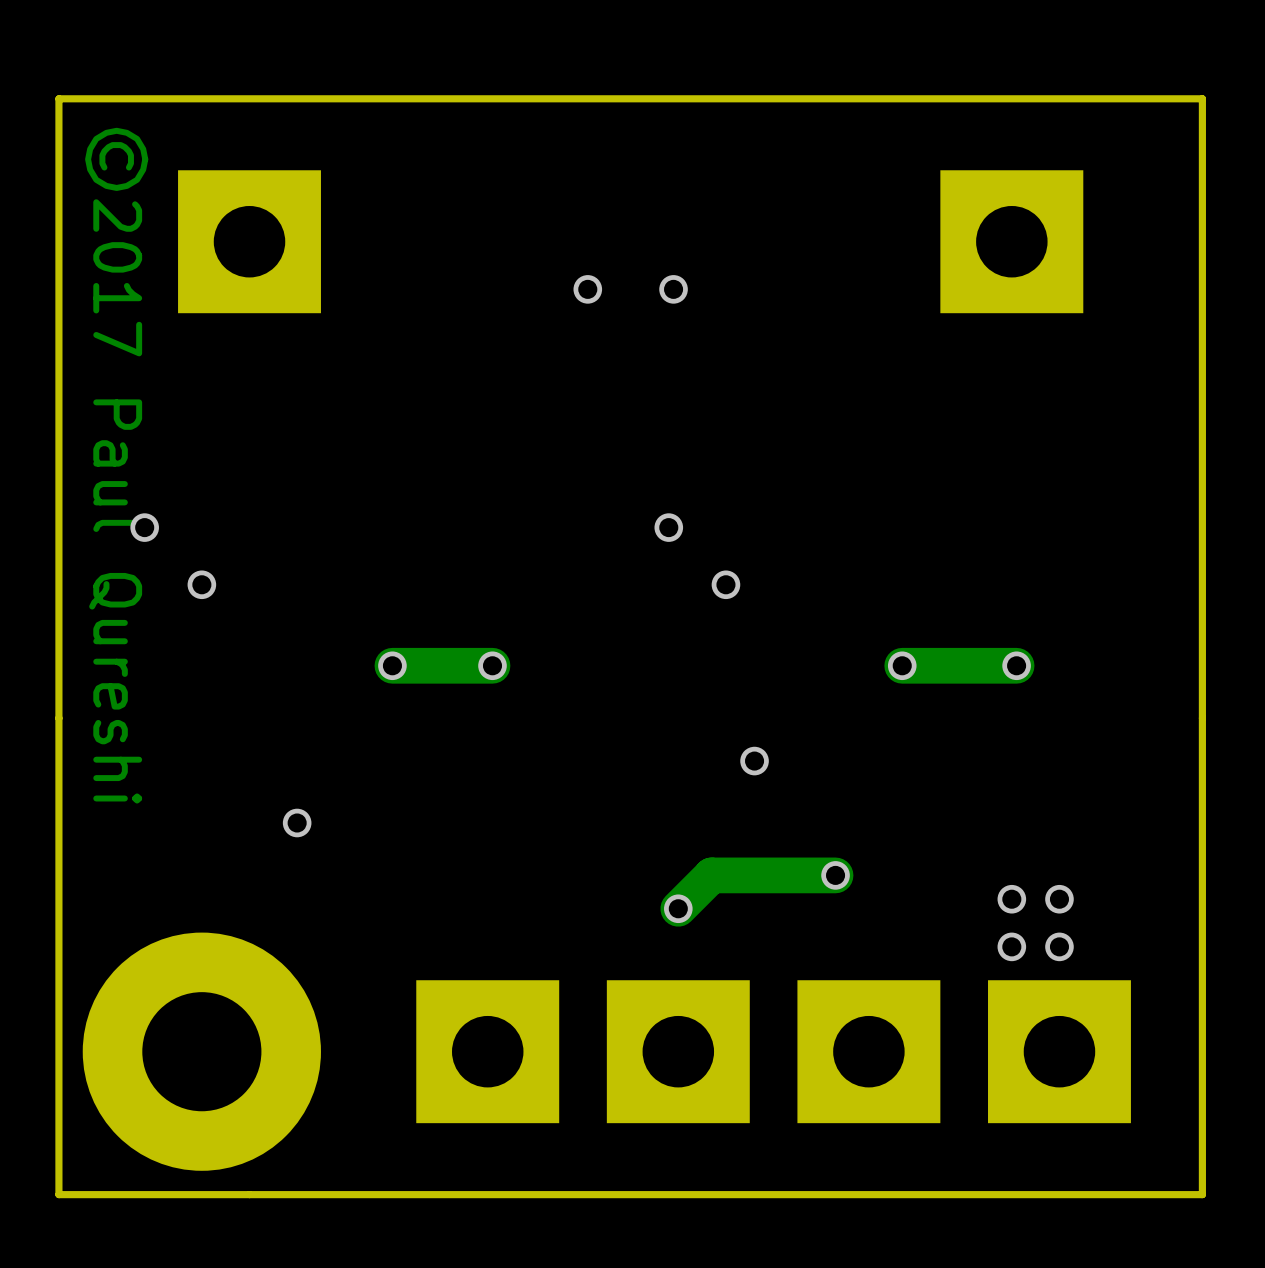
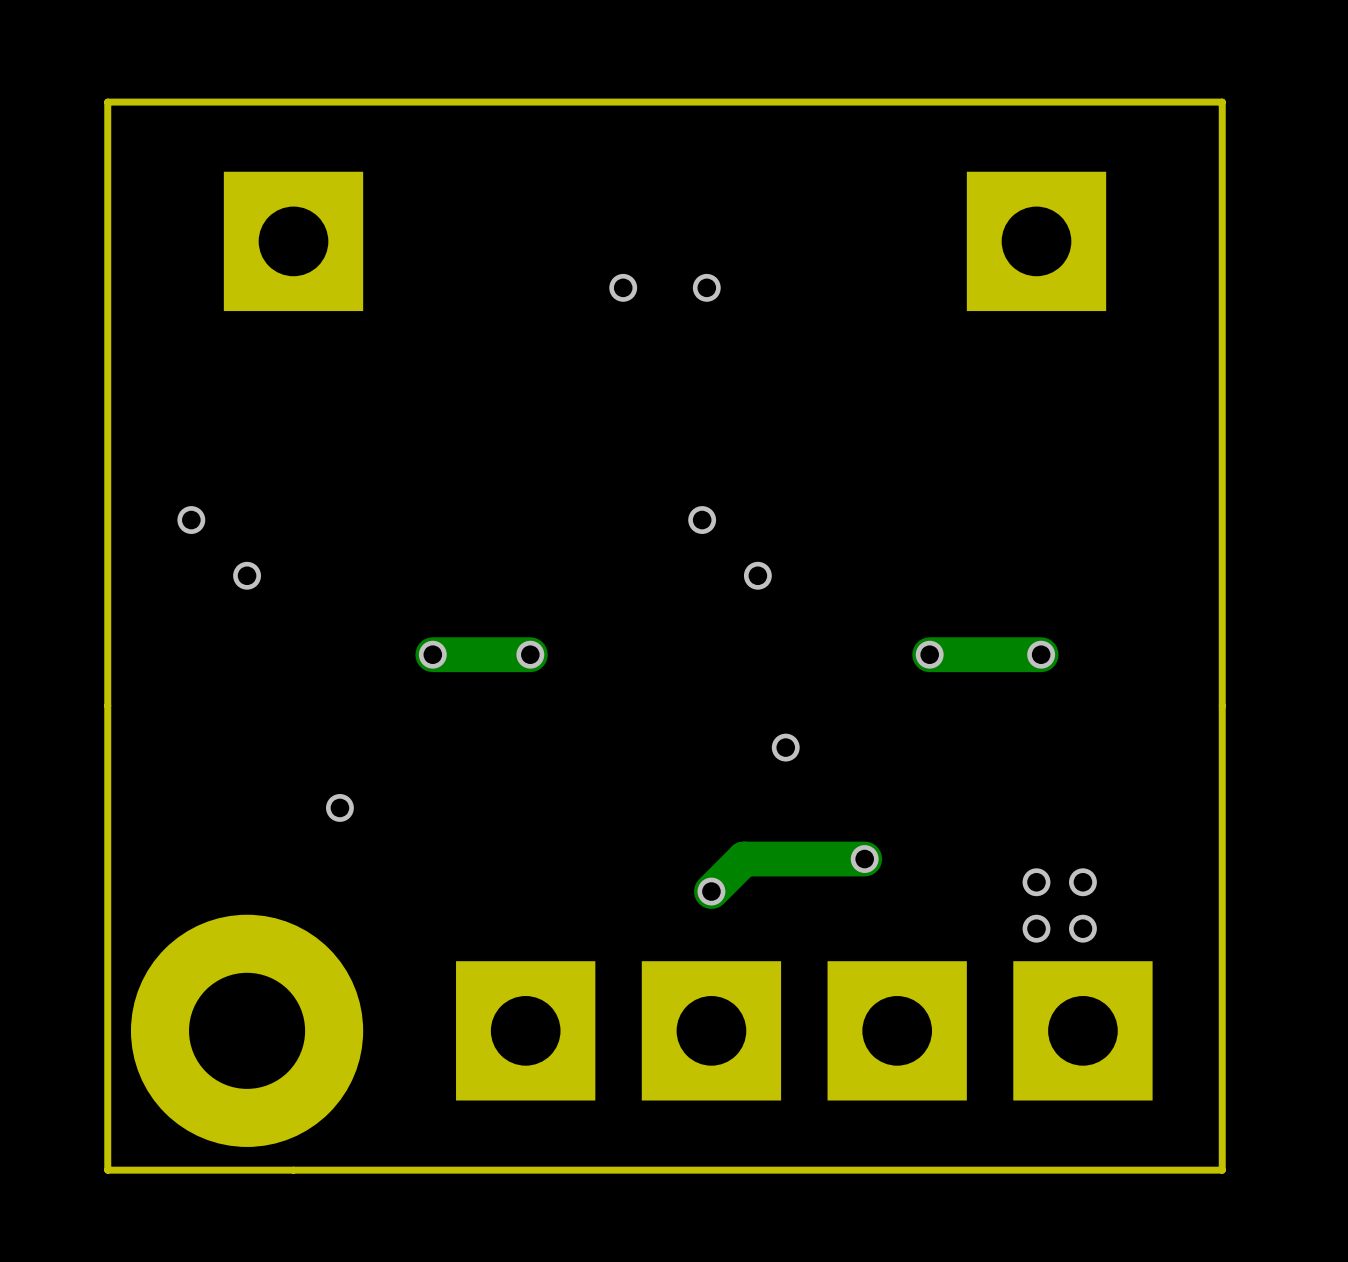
text: ©2017 Paul Qureshi (116, 465) -> none

